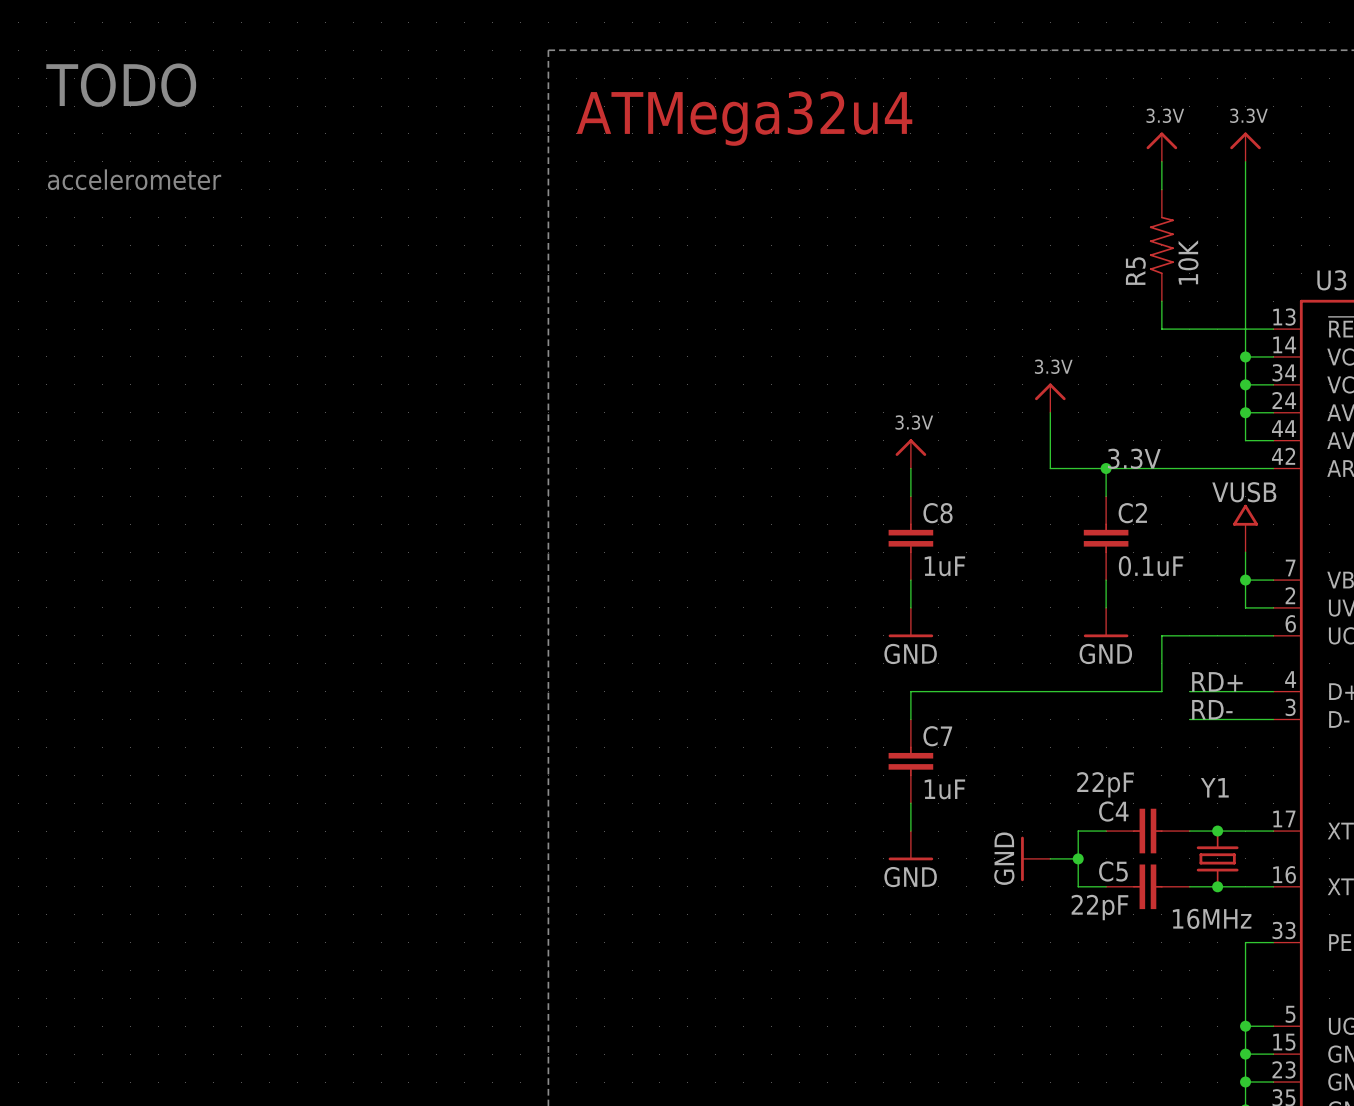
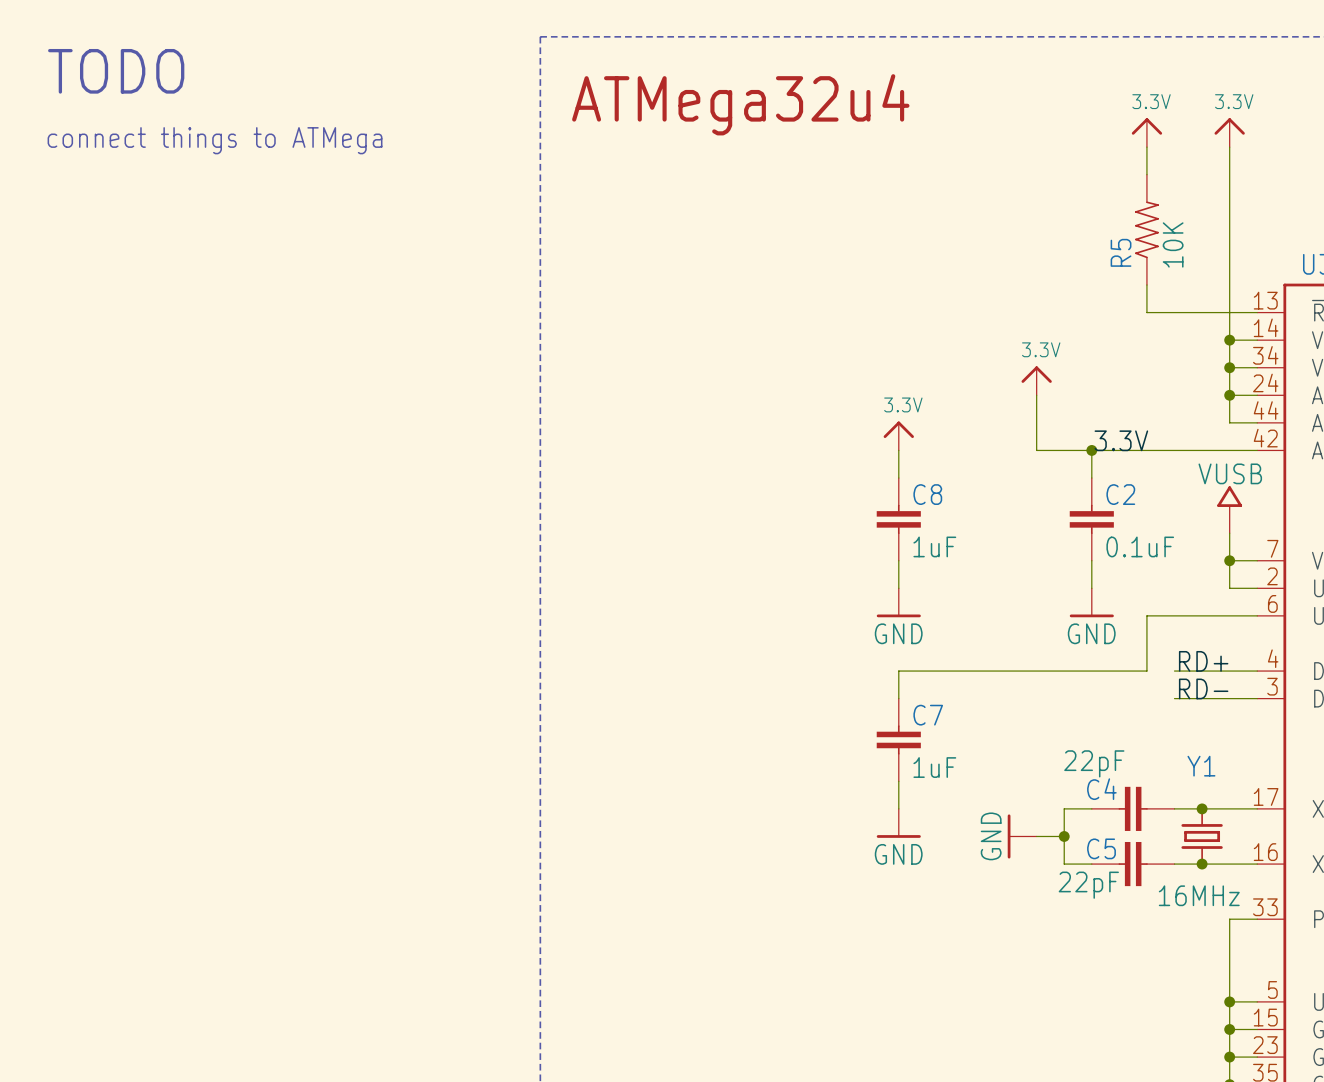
text: none -> connect things to ATMega (215, 140)
text: accelerometer (134, 179) -> none

